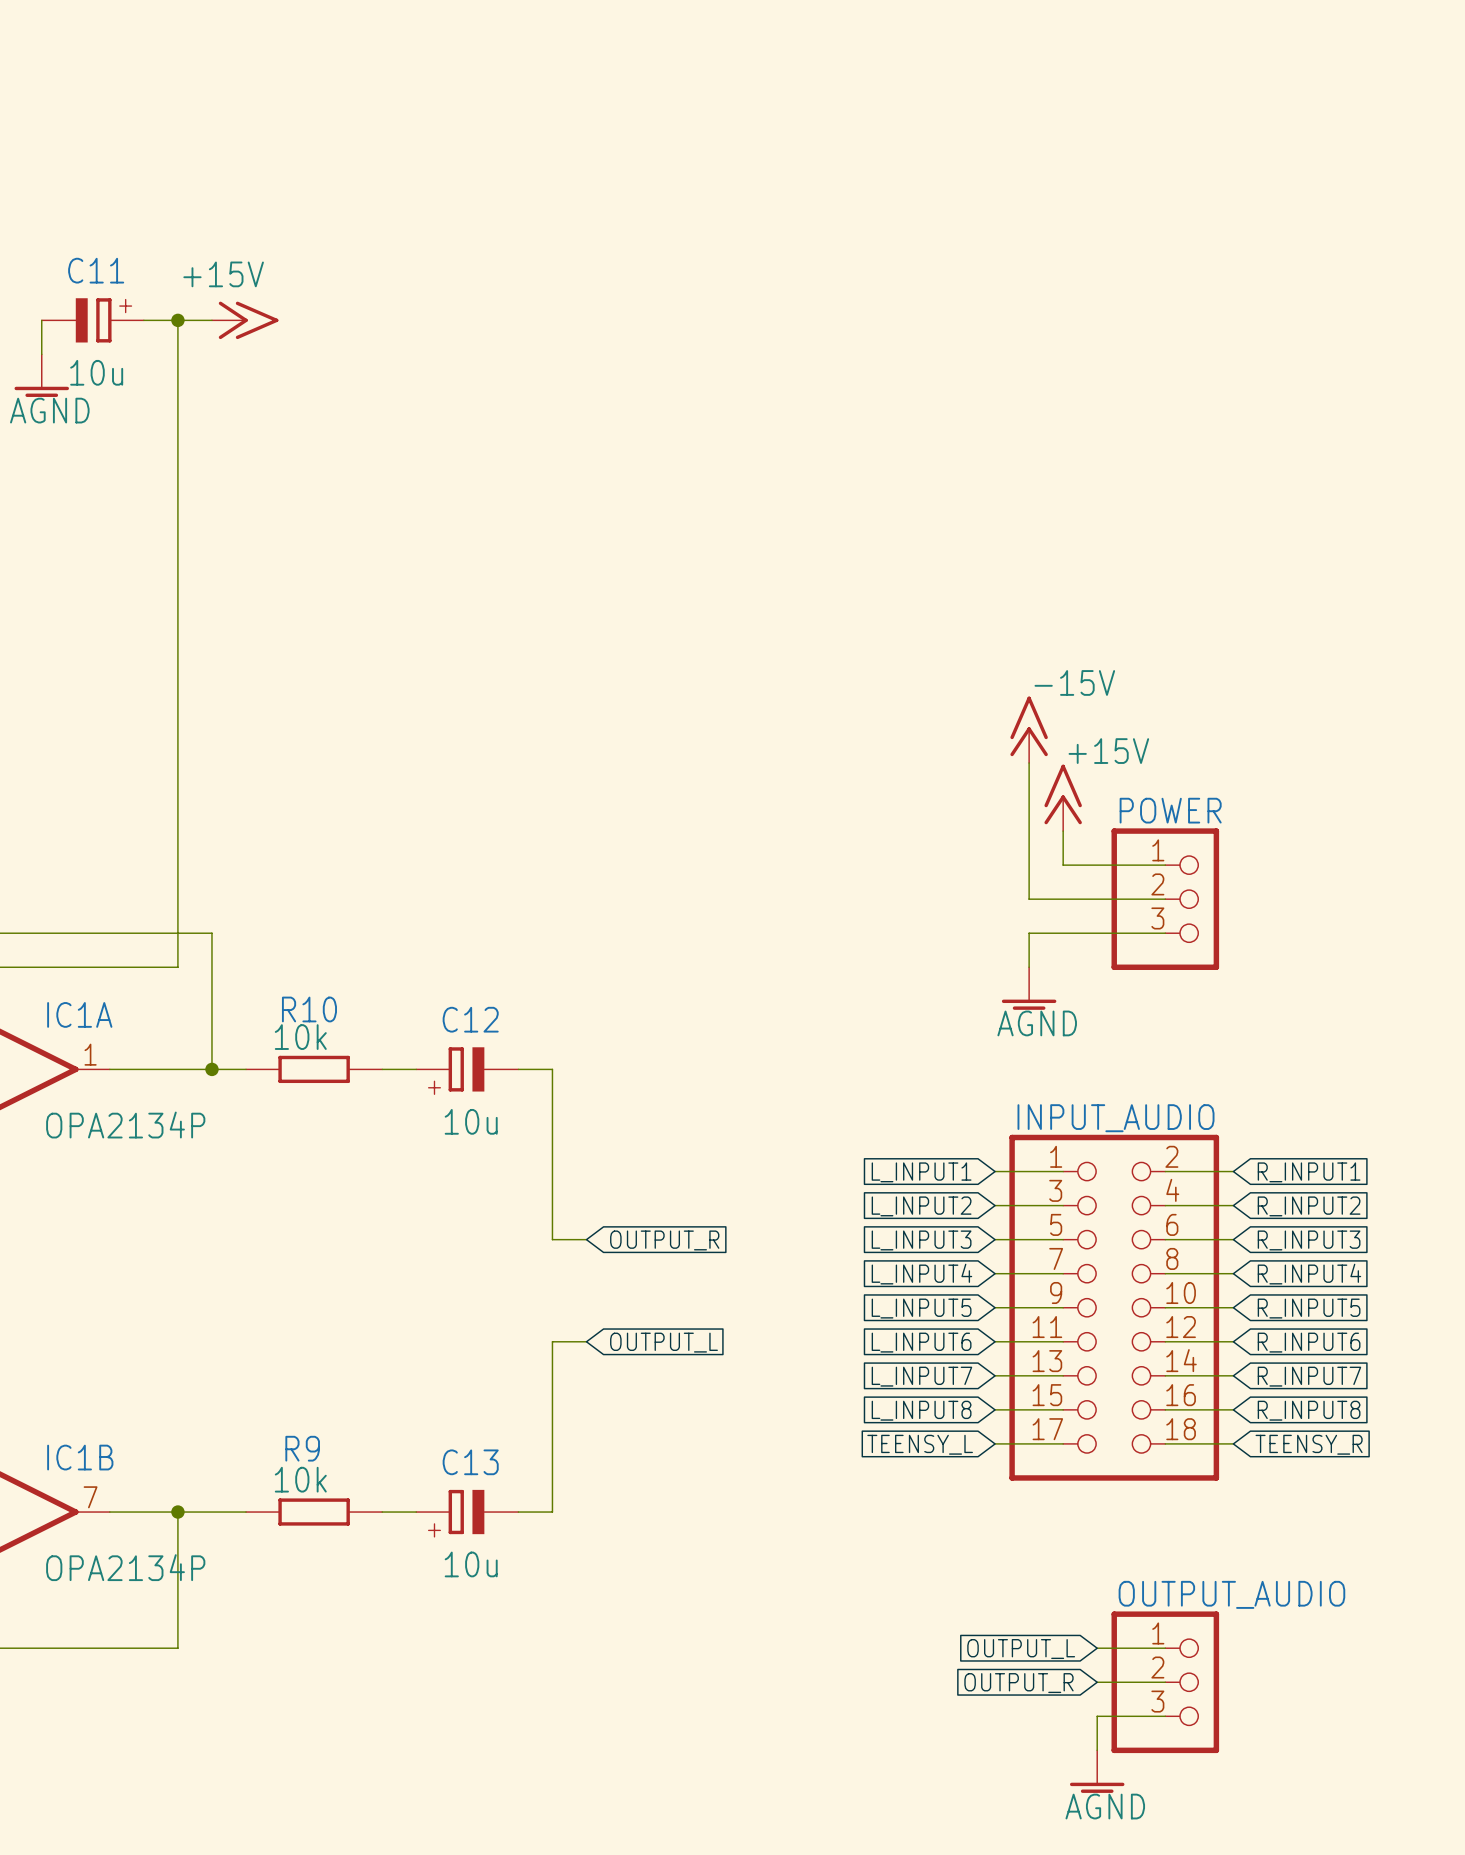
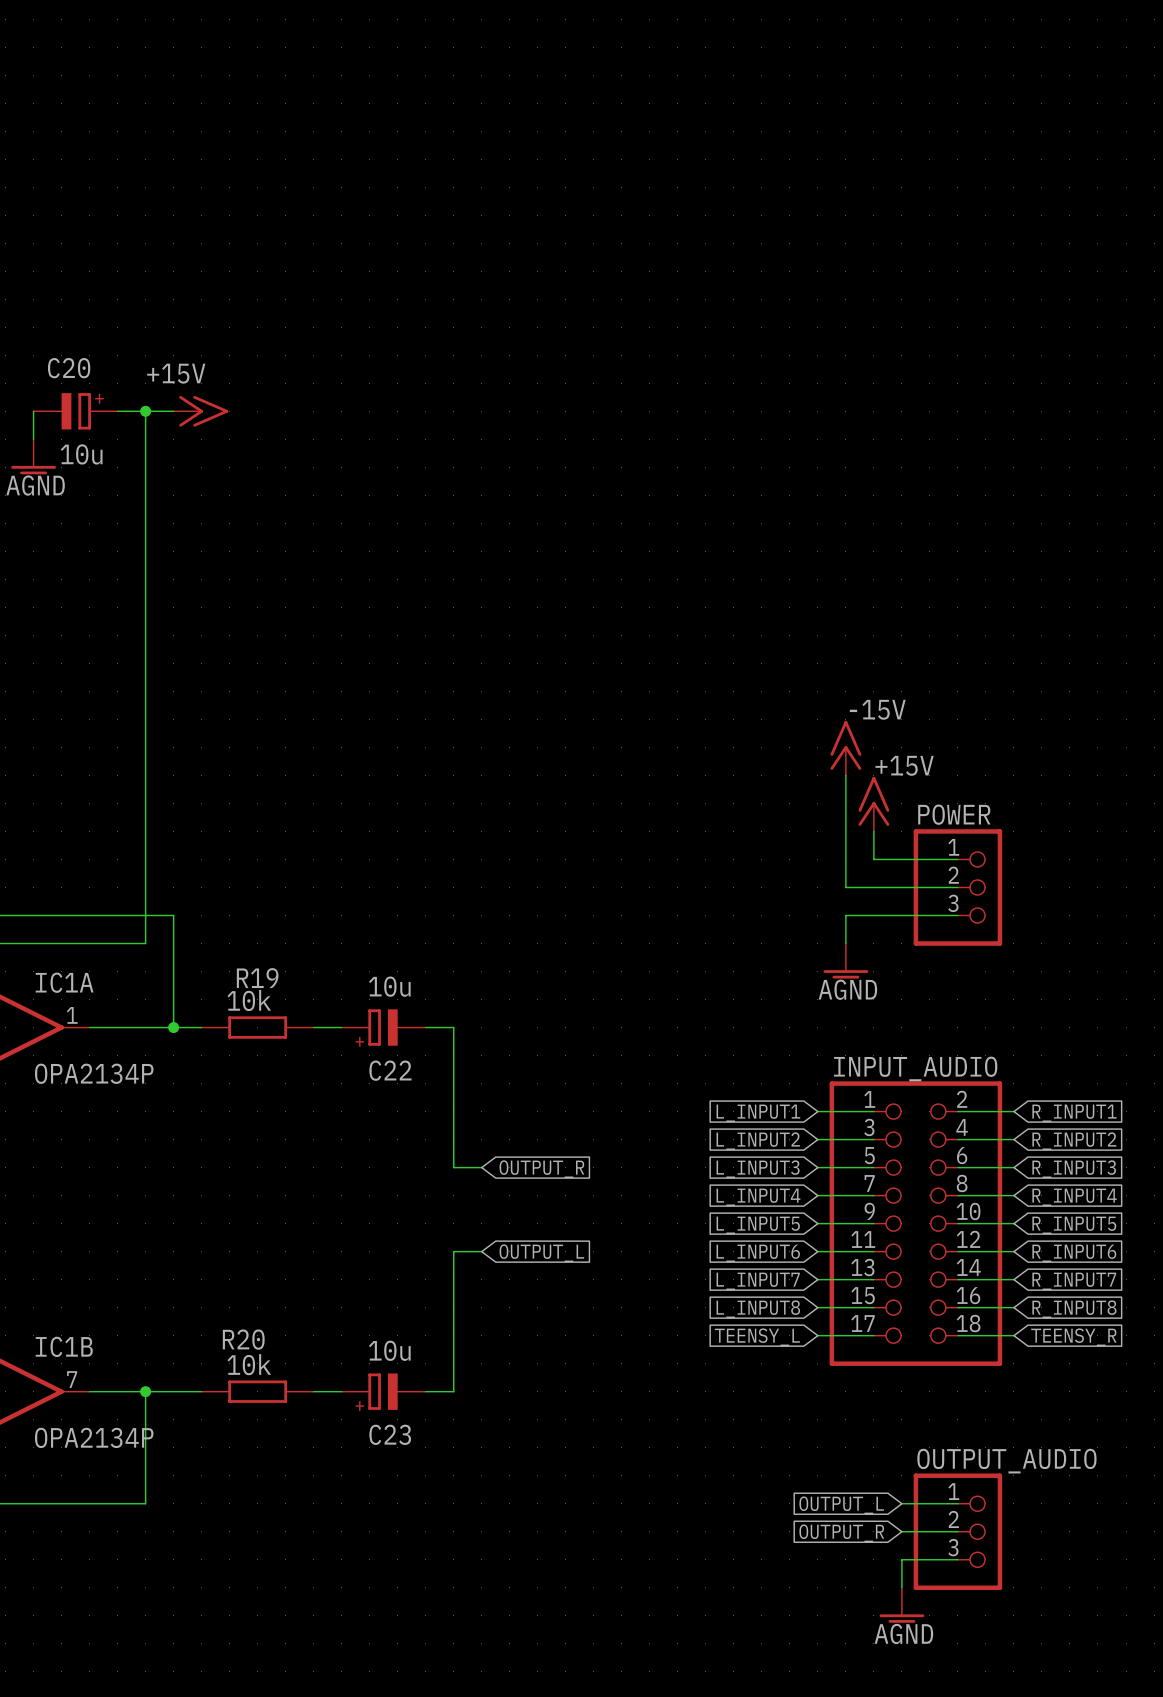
C11 name: C11 (96, 270) -> C20 (69, 368)
R10 name: R10 (309, 1009) -> R19 (257, 978)
C12 name: C12 (470, 1019) -> C22 (390, 1070)
C12 value position: 10u (471, 1121) -> 10u (389, 986)
R9 name: R9 (302, 1448) -> R20 (243, 1339)
C13 name: C13 (470, 1462) -> C23 (390, 1434)
C13 value position: 10u (471, 1564) -> 10u (389, 1350)

